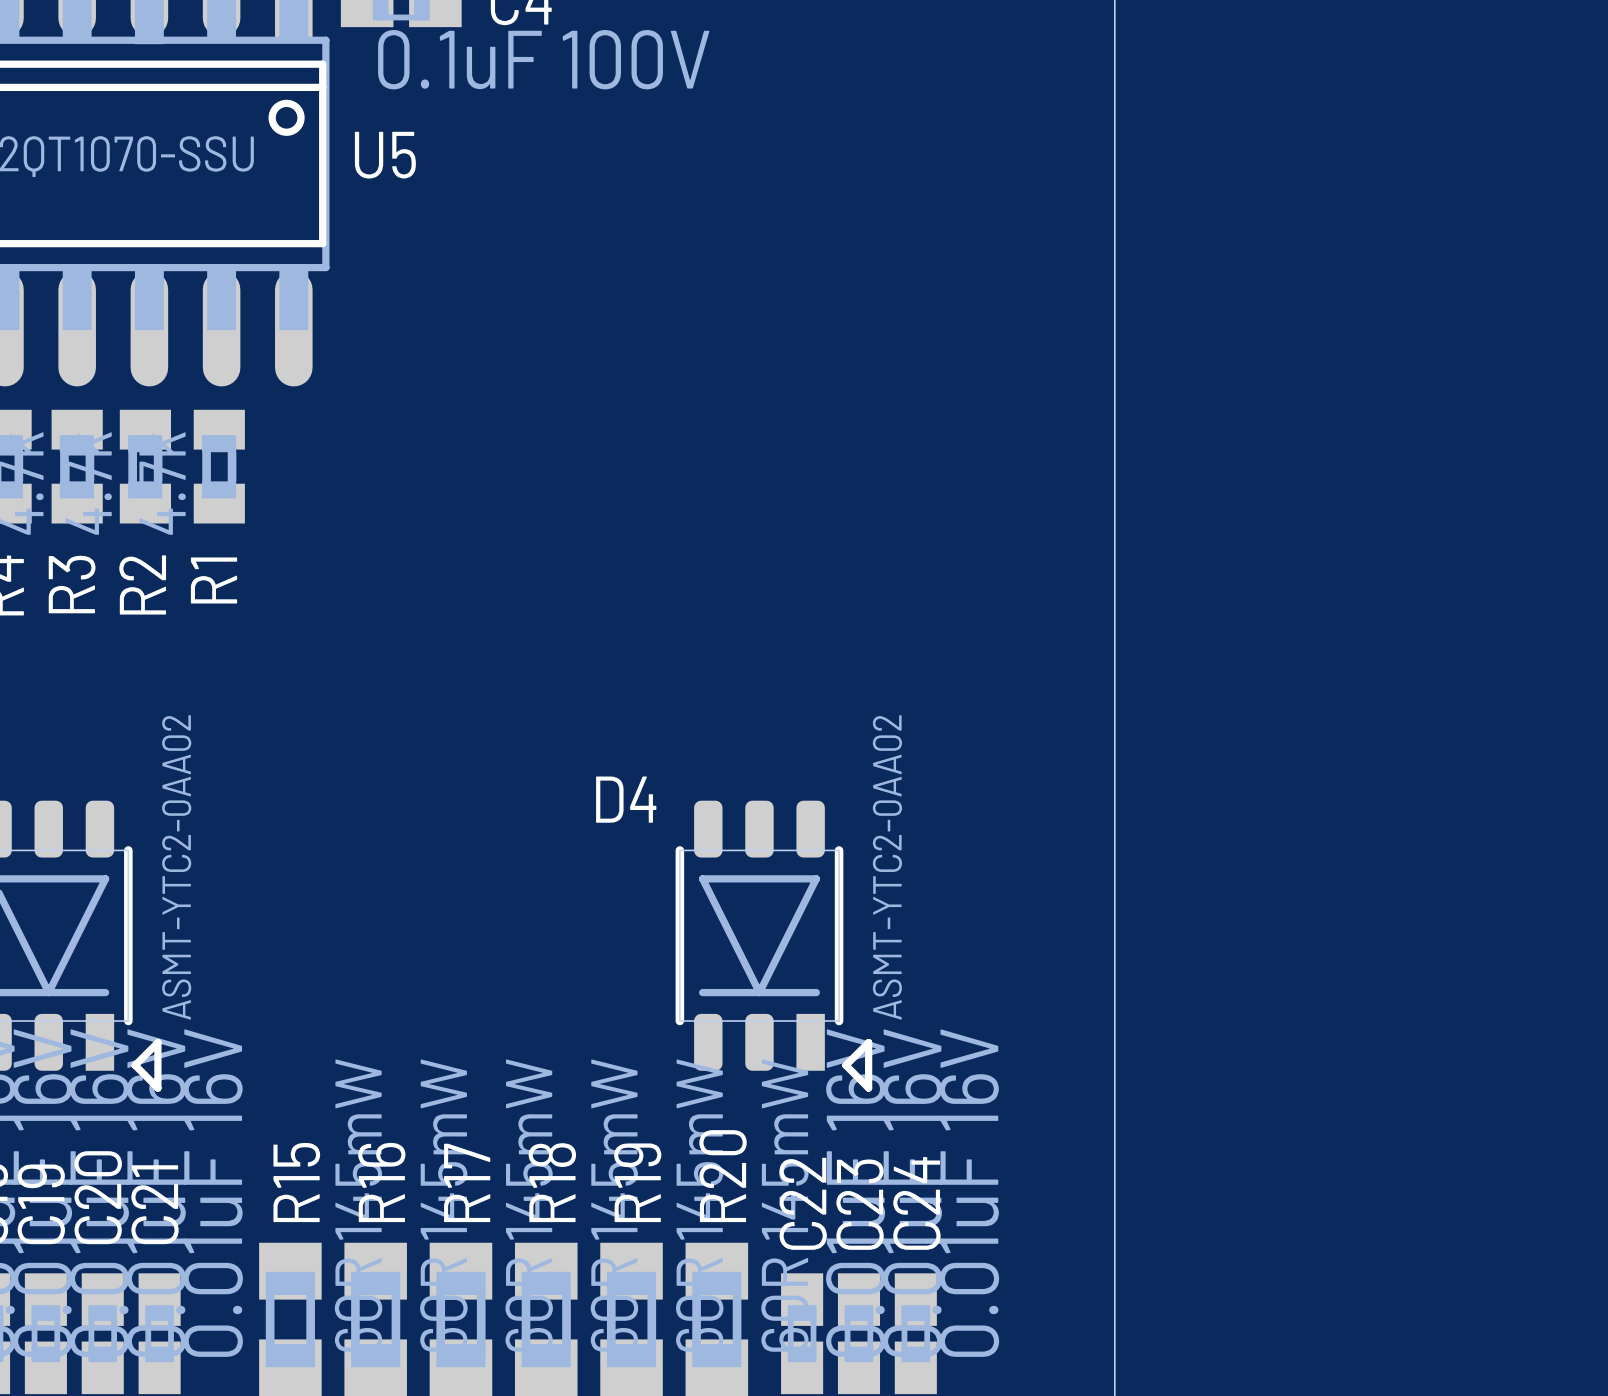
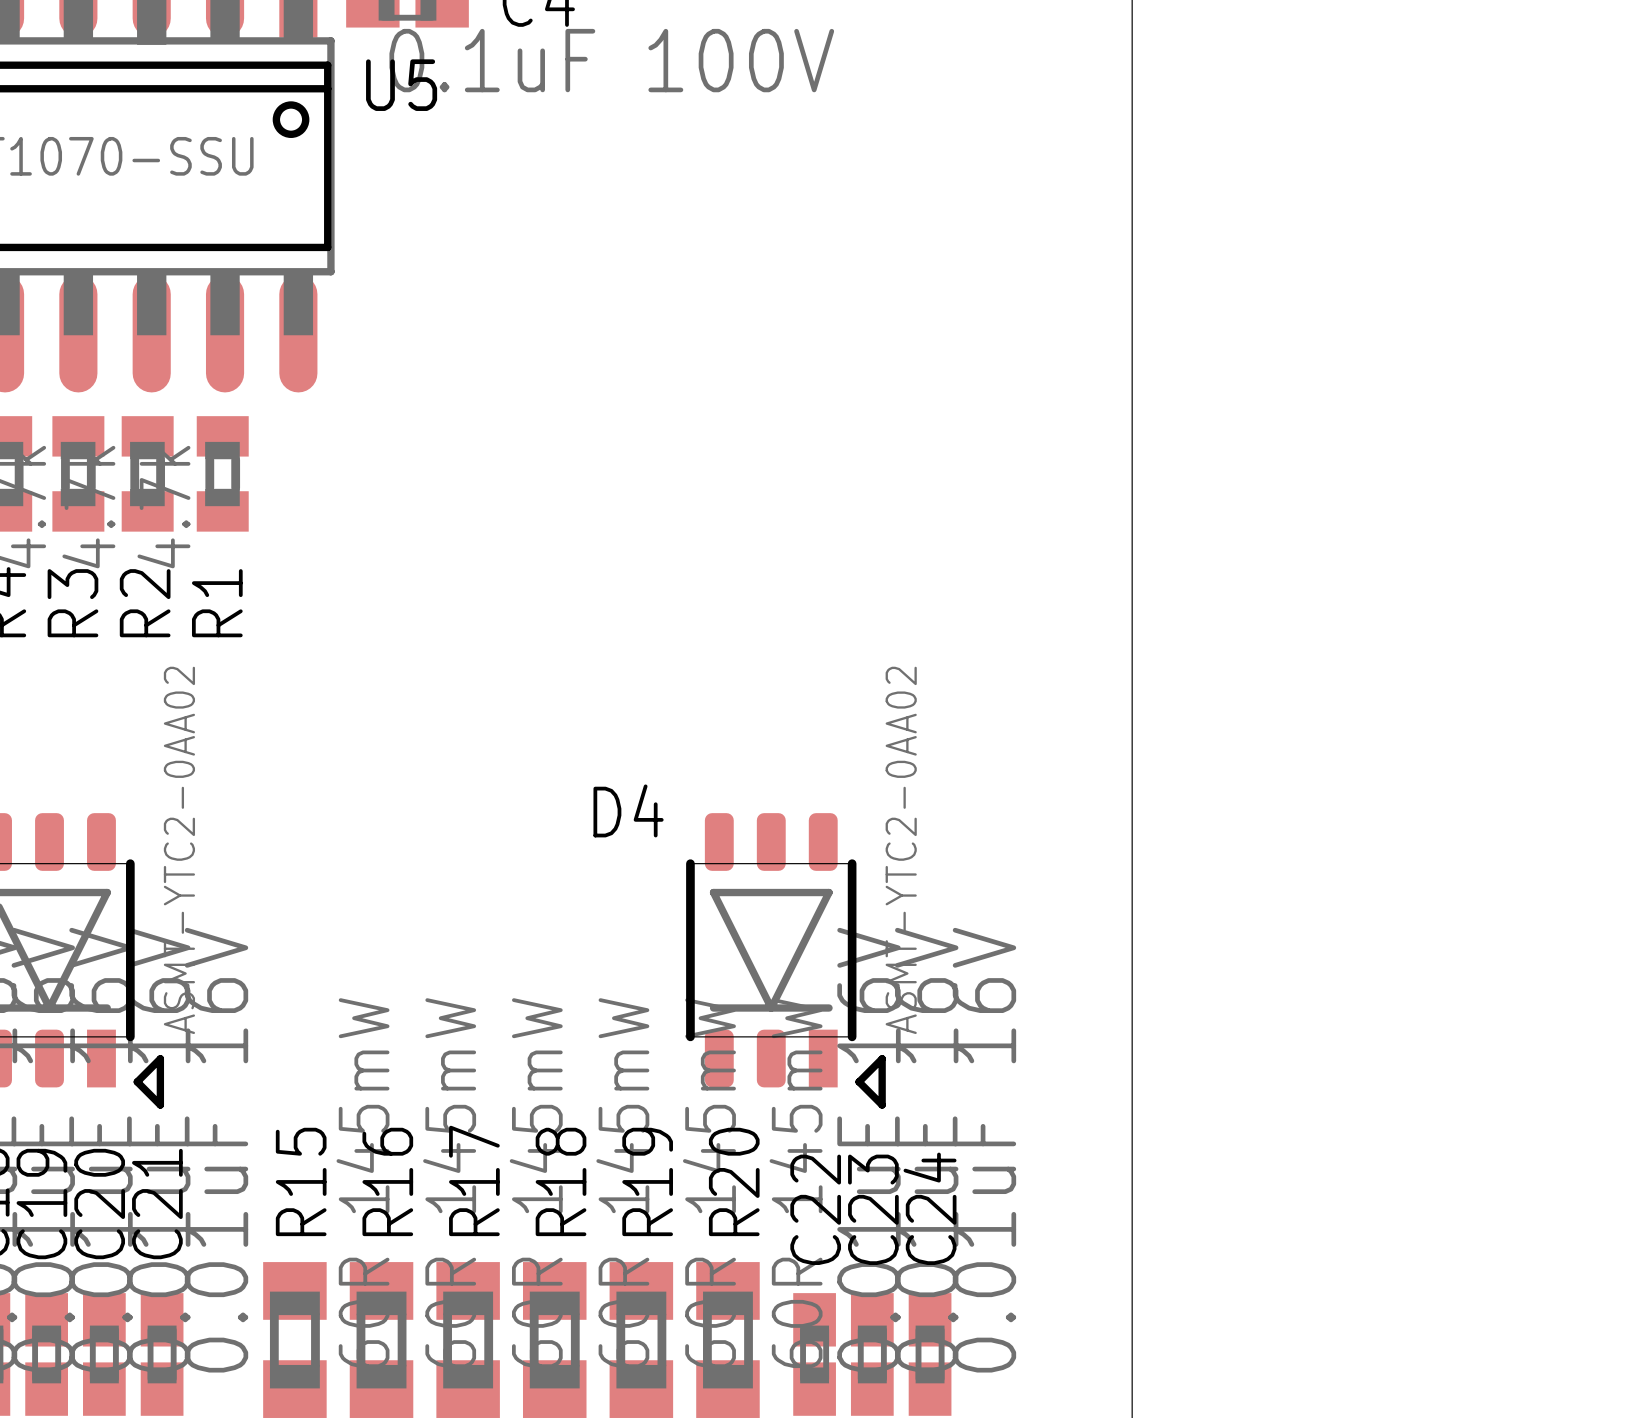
U5 name position: U5 (385, 155) -> U5 (401, 85)

